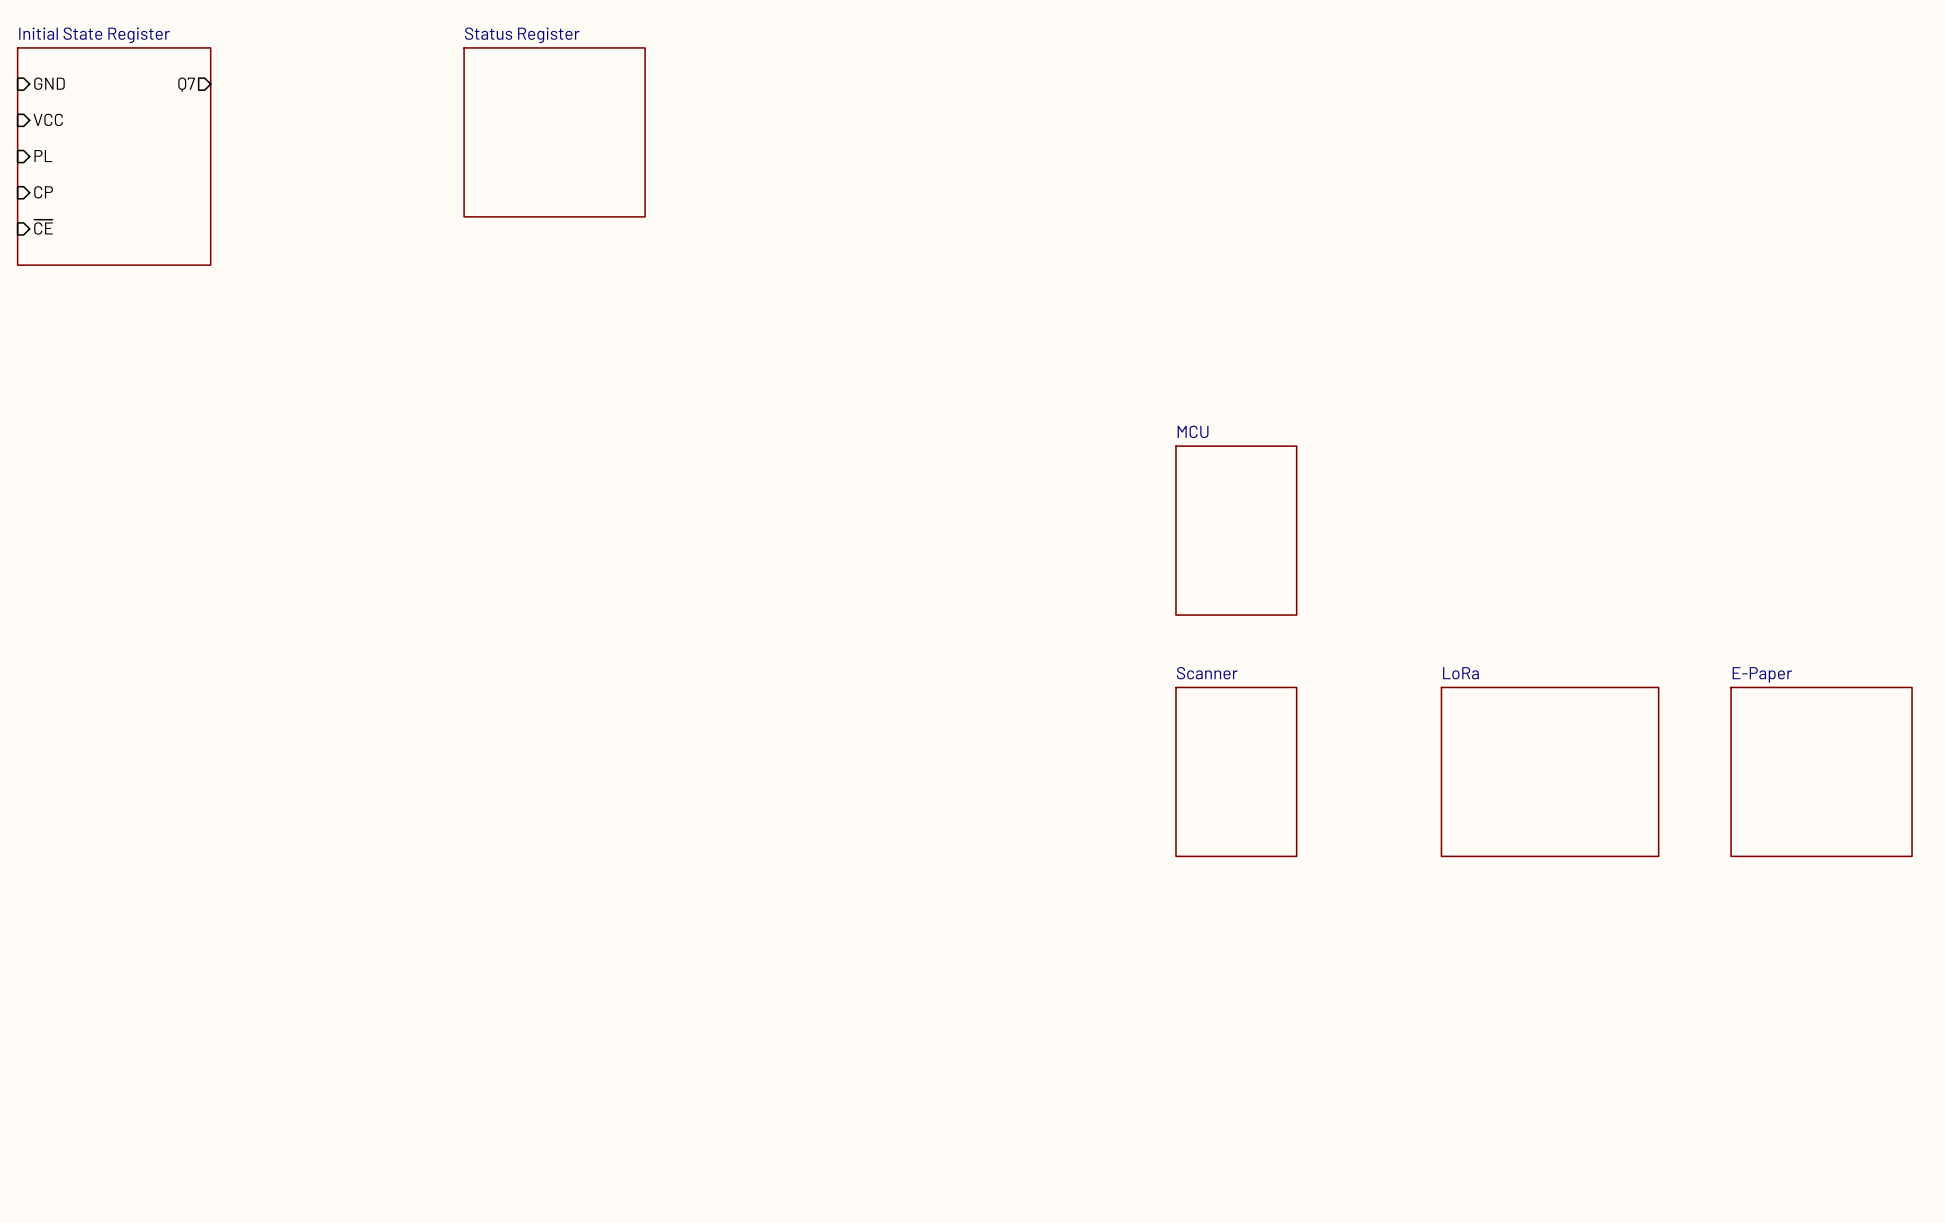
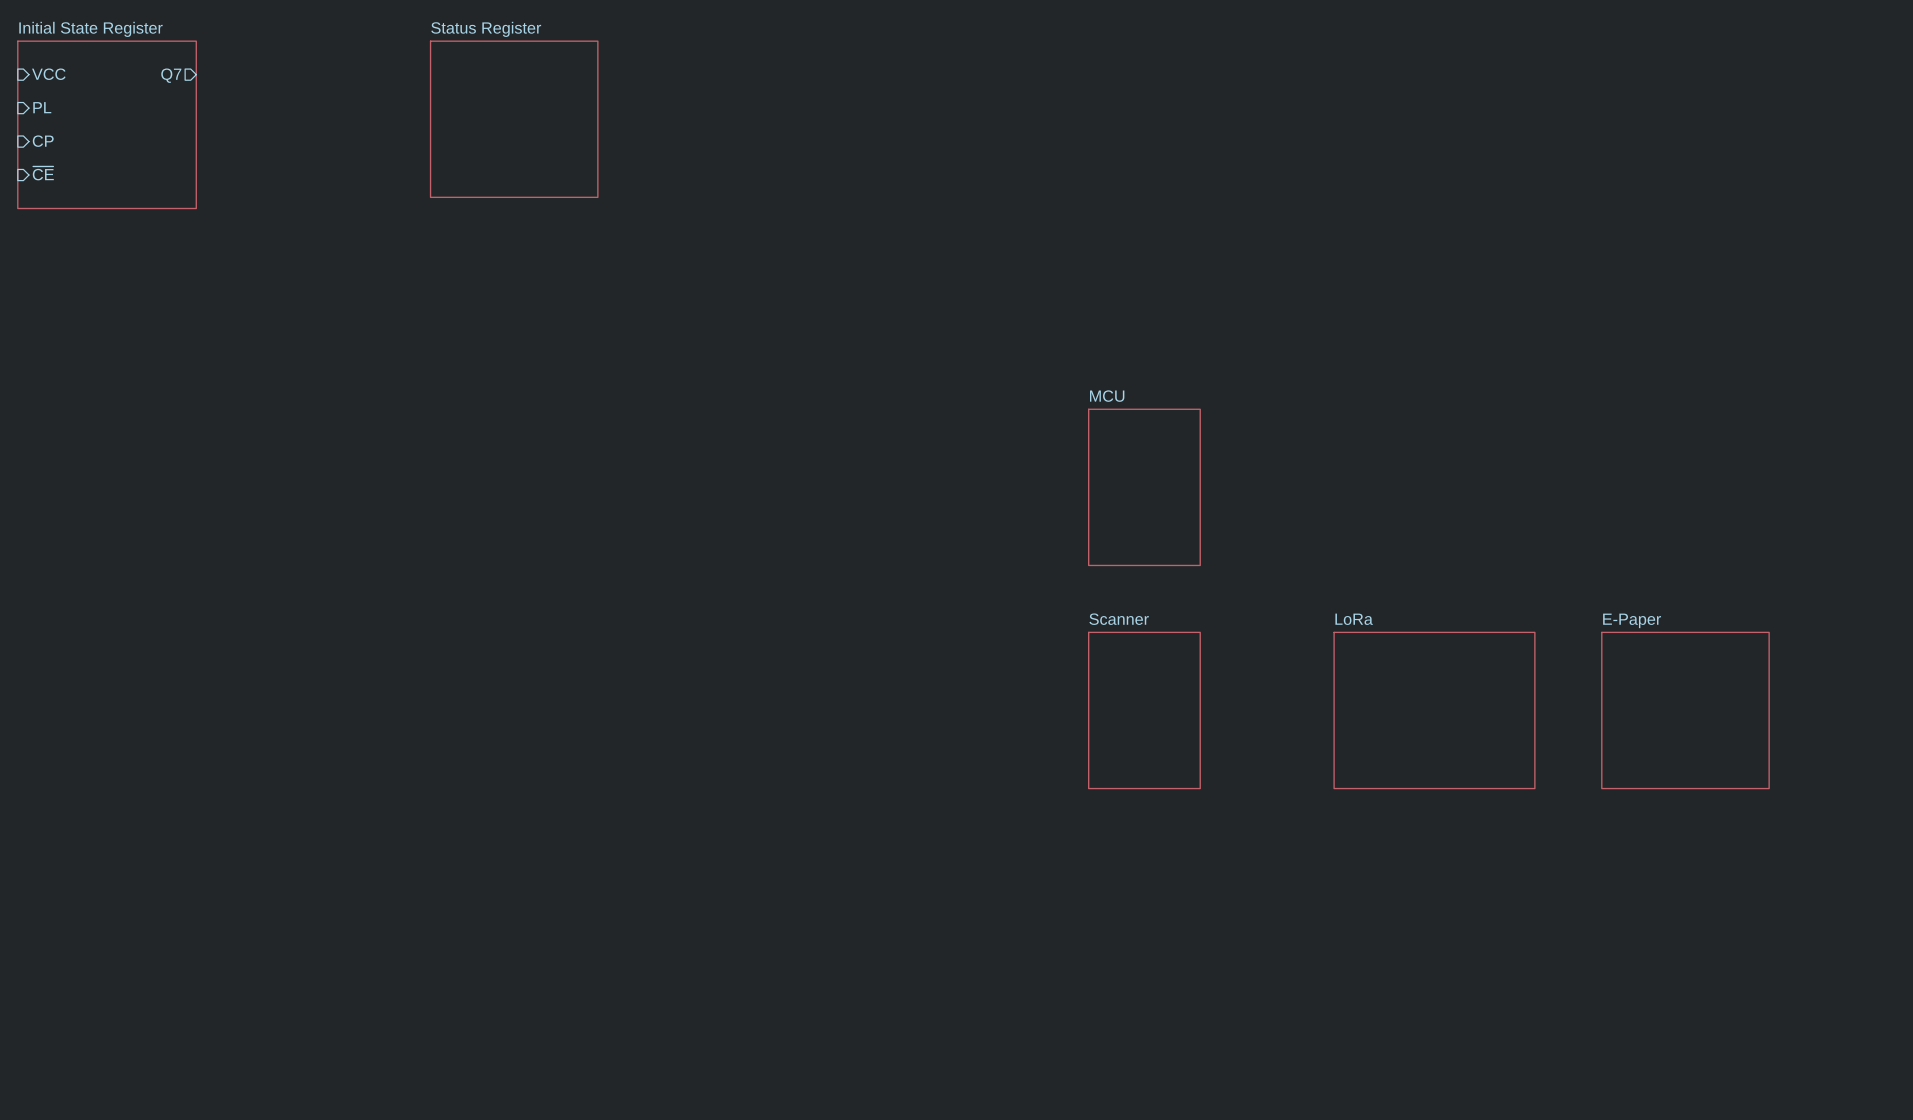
sheet pin: GND (49, 83) -> VCC (48, 74)
sheet pin: VCC (48, 119) -> PL (42, 107)
sheet Initial State Register: none -> (107, 124)
sheet pin: PL (43, 156) -> CP (43, 141)
sheet Initial State Register: (114, 156) -> none
sheet pin: CP (43, 192) -> ~{CE} (43, 173)
sheet pin: ~{CE} (43, 227) -> none

